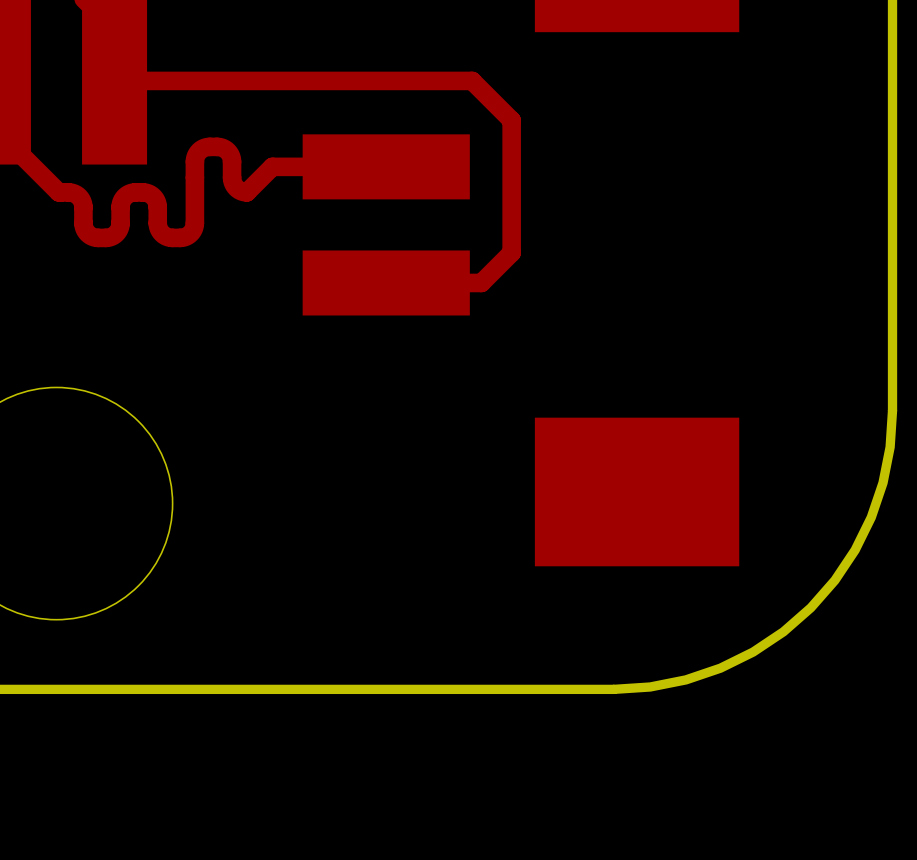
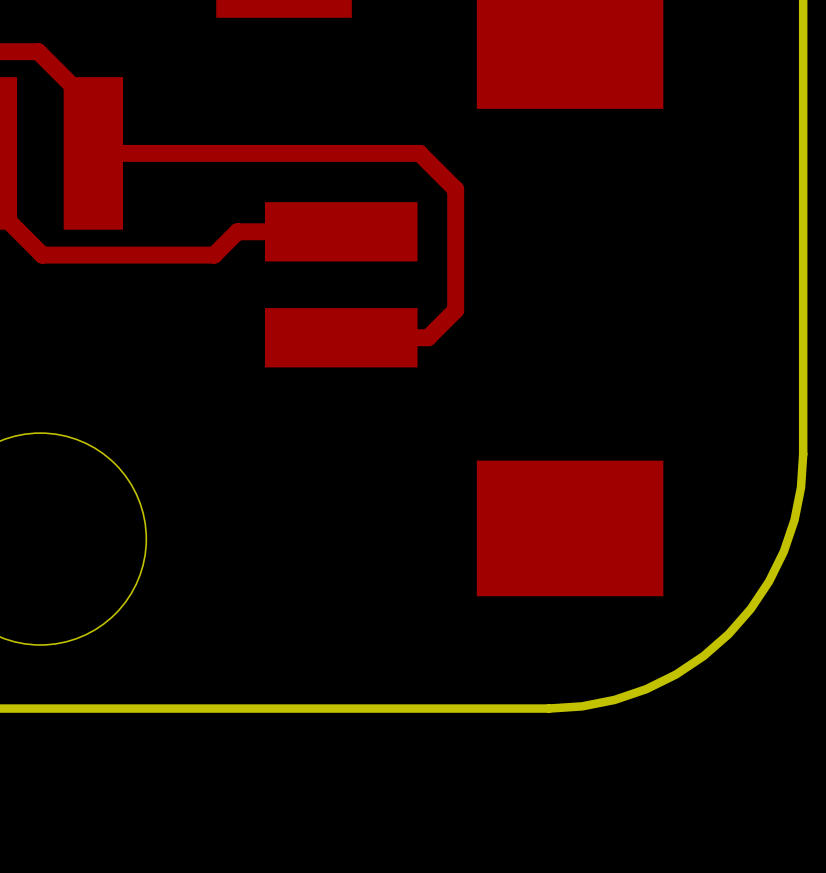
top track: (135, 192) (128, 194) (121, 201) (118, 230) (113, 235) (105, 237) (94, 237) (86, 232) (83, 224) (82, 201) (77, 195) (68, 192) -> (112, 255) (51, 255)
top track: (246, 192) (237, 189) (233, 183) (230, 154) (224, 148) (217, 146) (202, 148) (195, 157) (194, 224) (192, 230) (187, 235) (170, 237) (162, 233) (157, 224) (156, 201) (150, 194) (142, 192) -> (214, 255) (119, 255)

